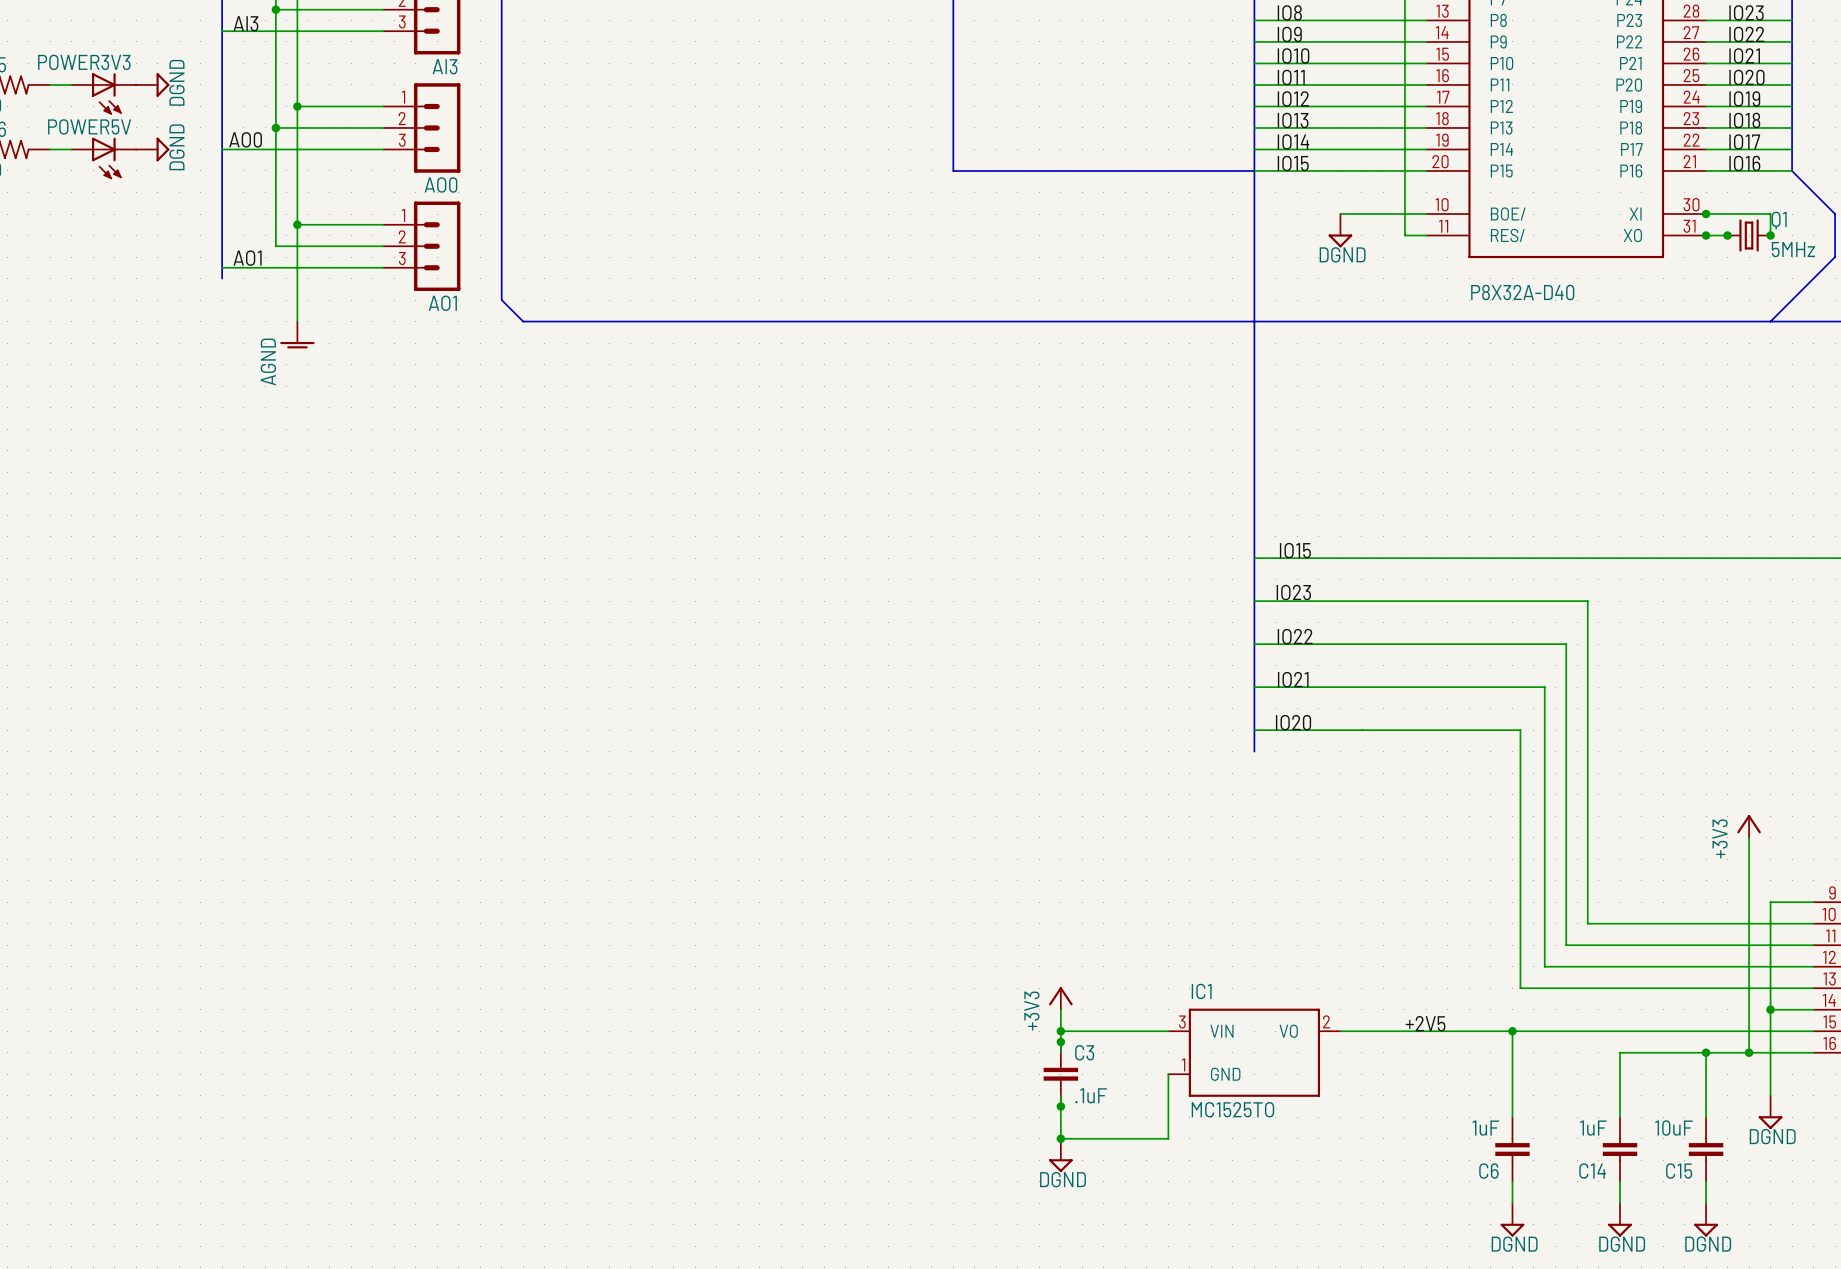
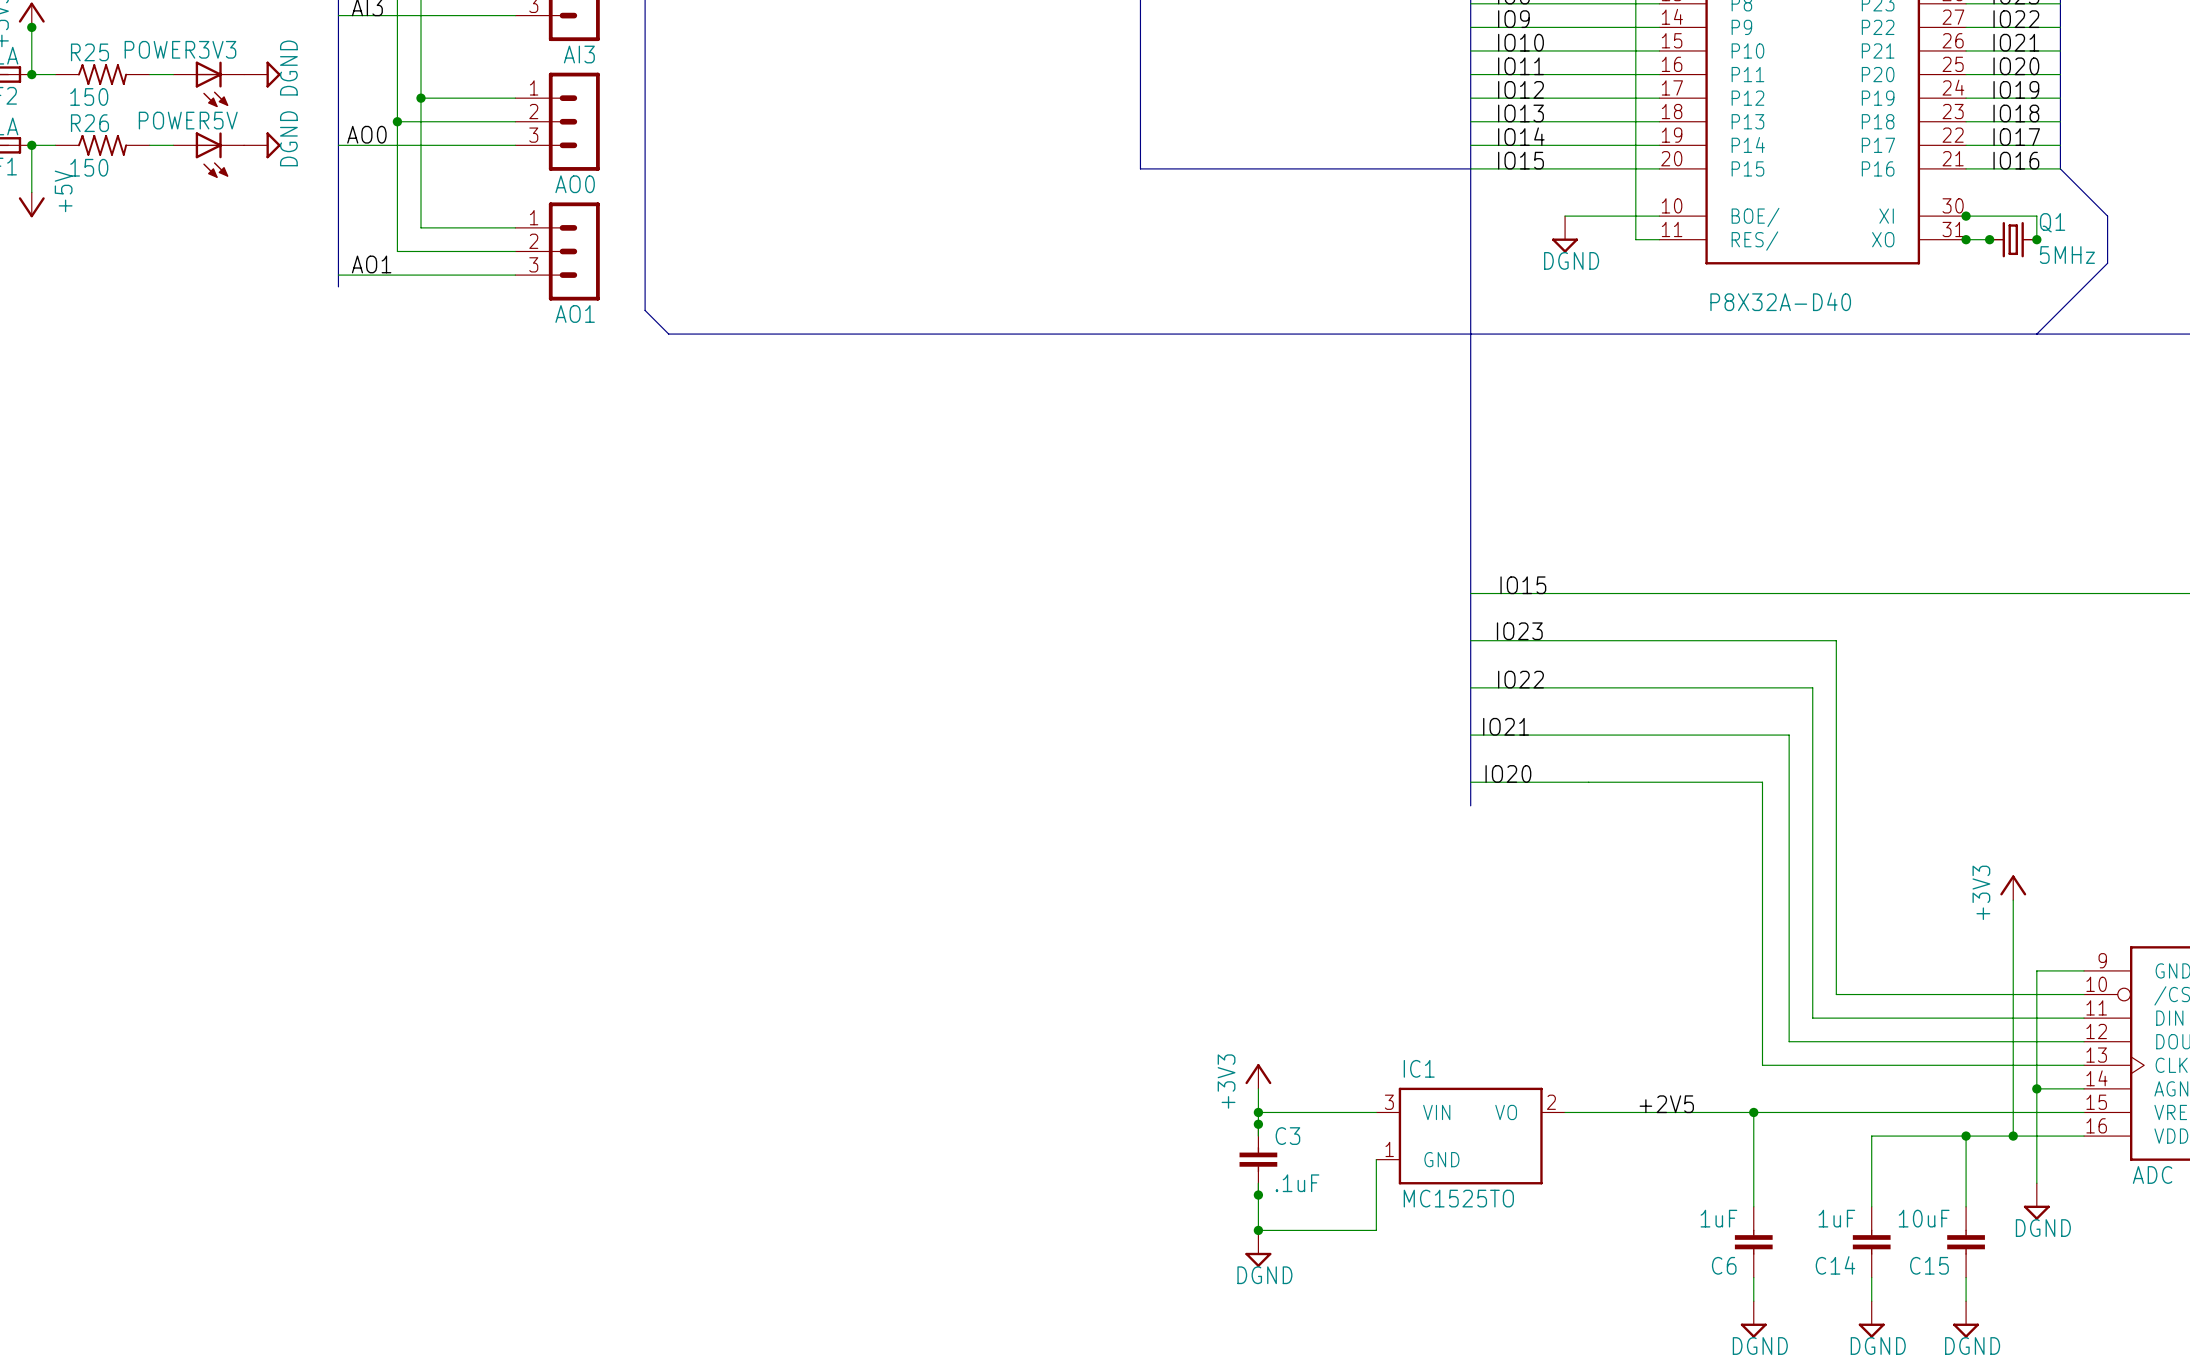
wire: (297, 224) (297, 321) -> none
junction: (297, 224) -> none
power symbol: AGND (297, 334) -> none

